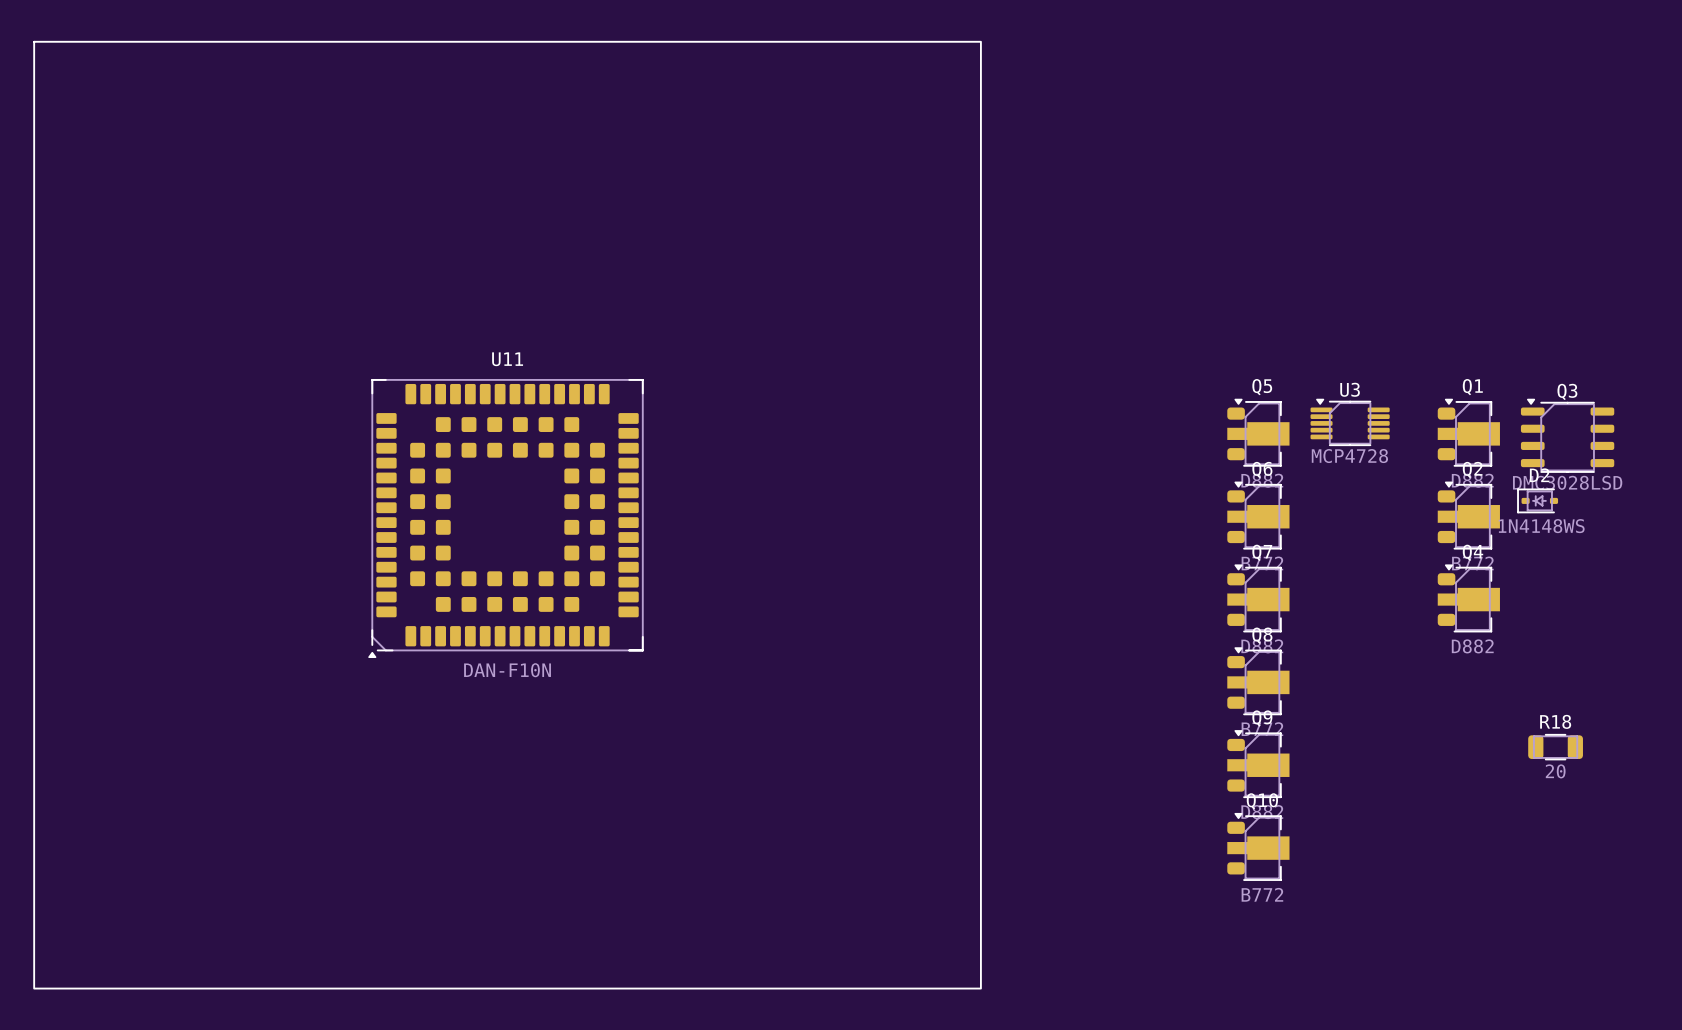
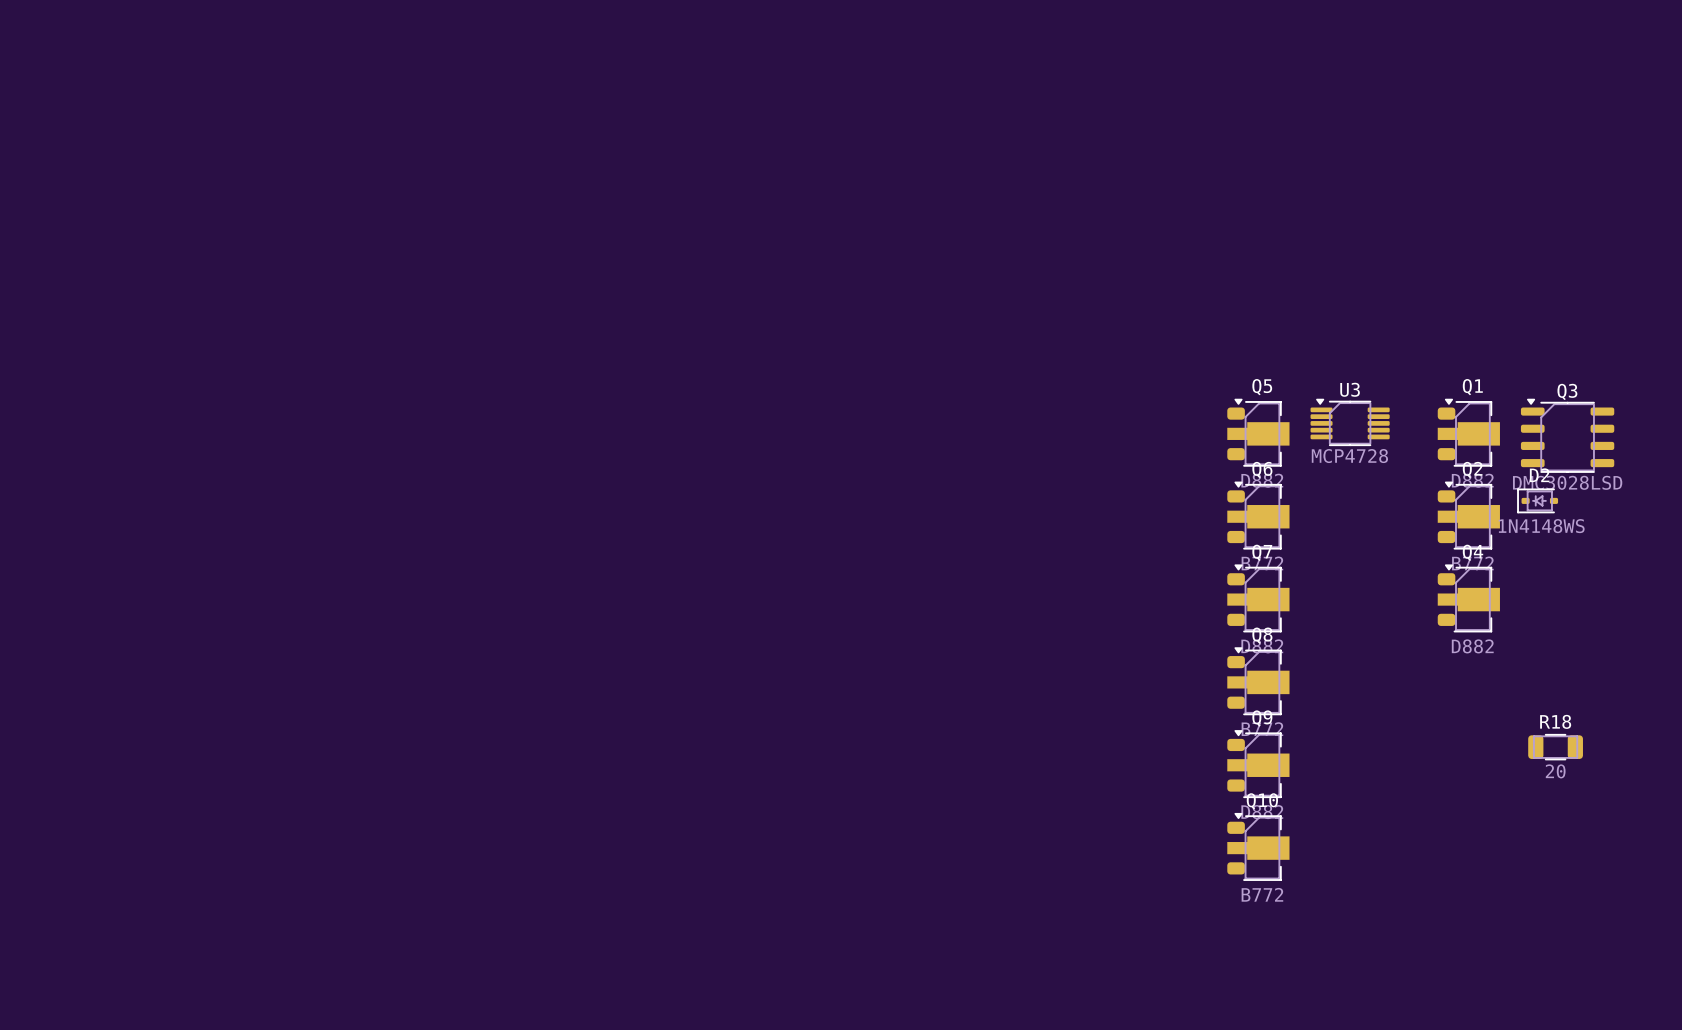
U11: DAN-F10N (507, 515) -> none

